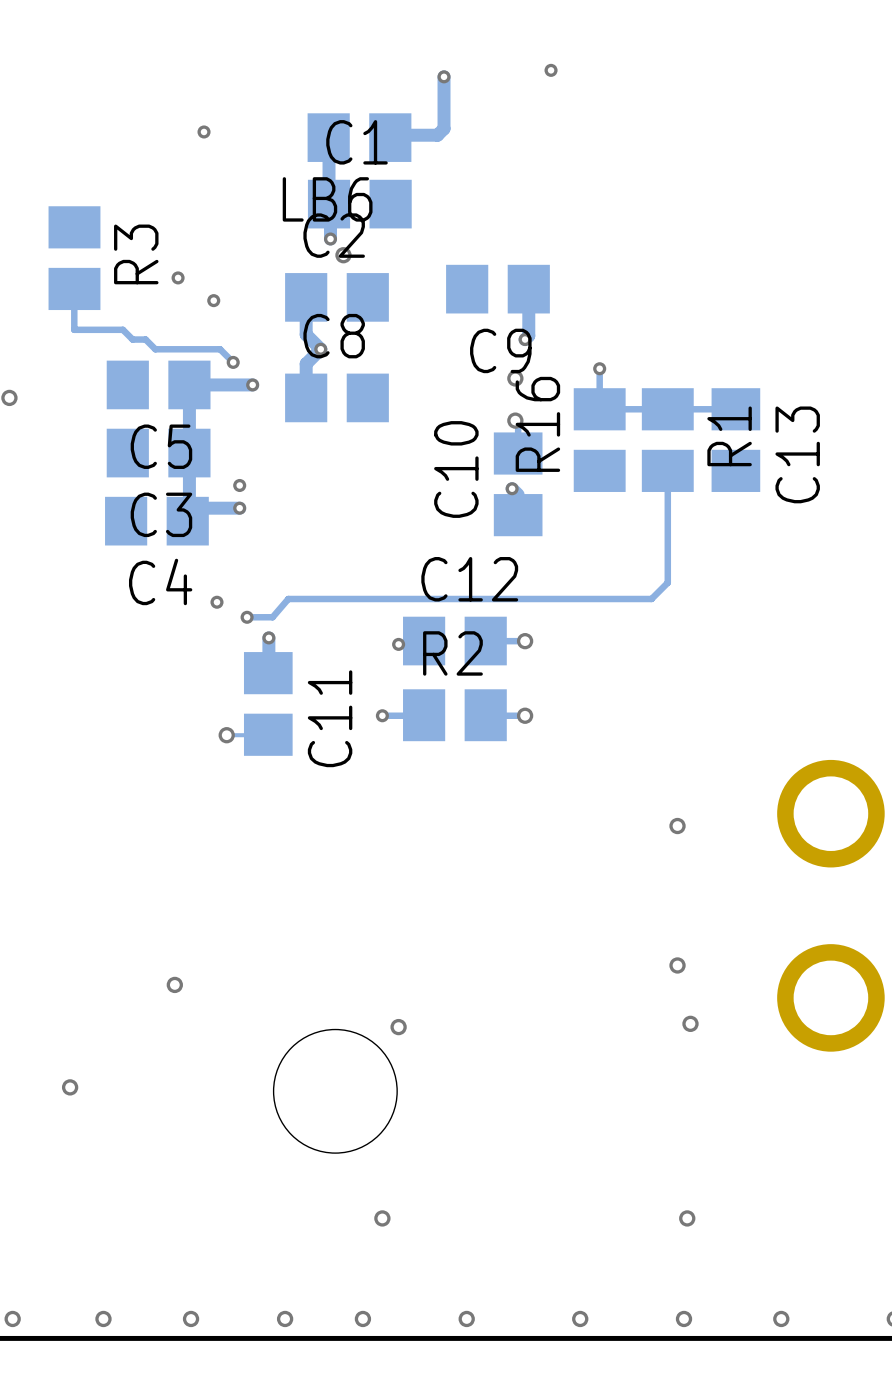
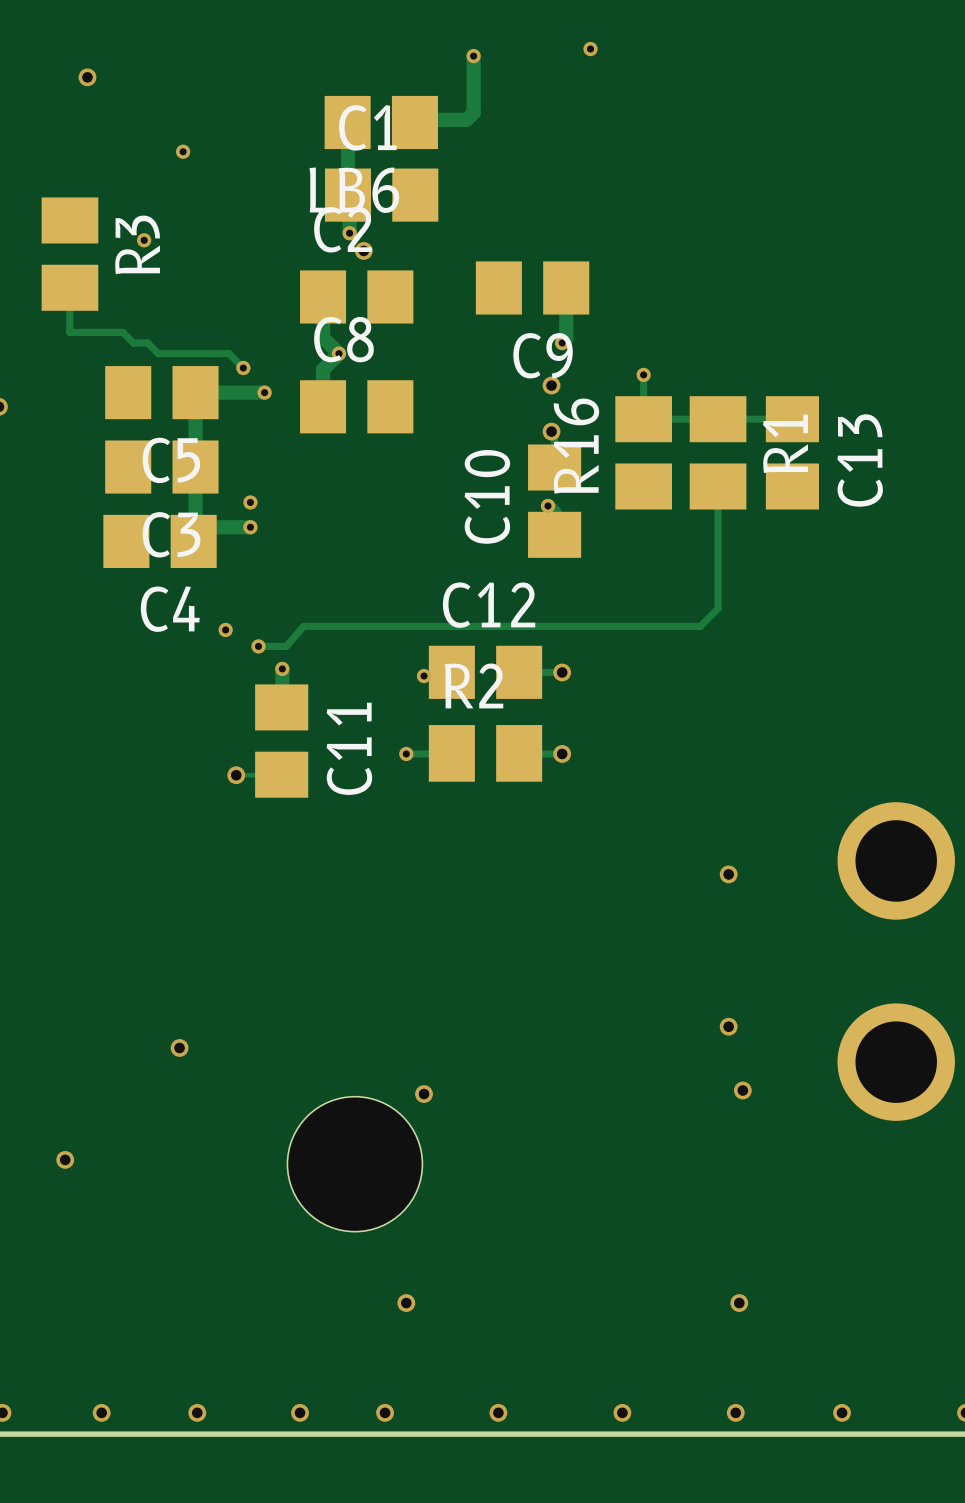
via: none -> (87, 77)
via position: (204, 131) -> (183, 151)
via: none -> (144, 240)
via: (178, 277) -> none
via: (213, 300) -> none

